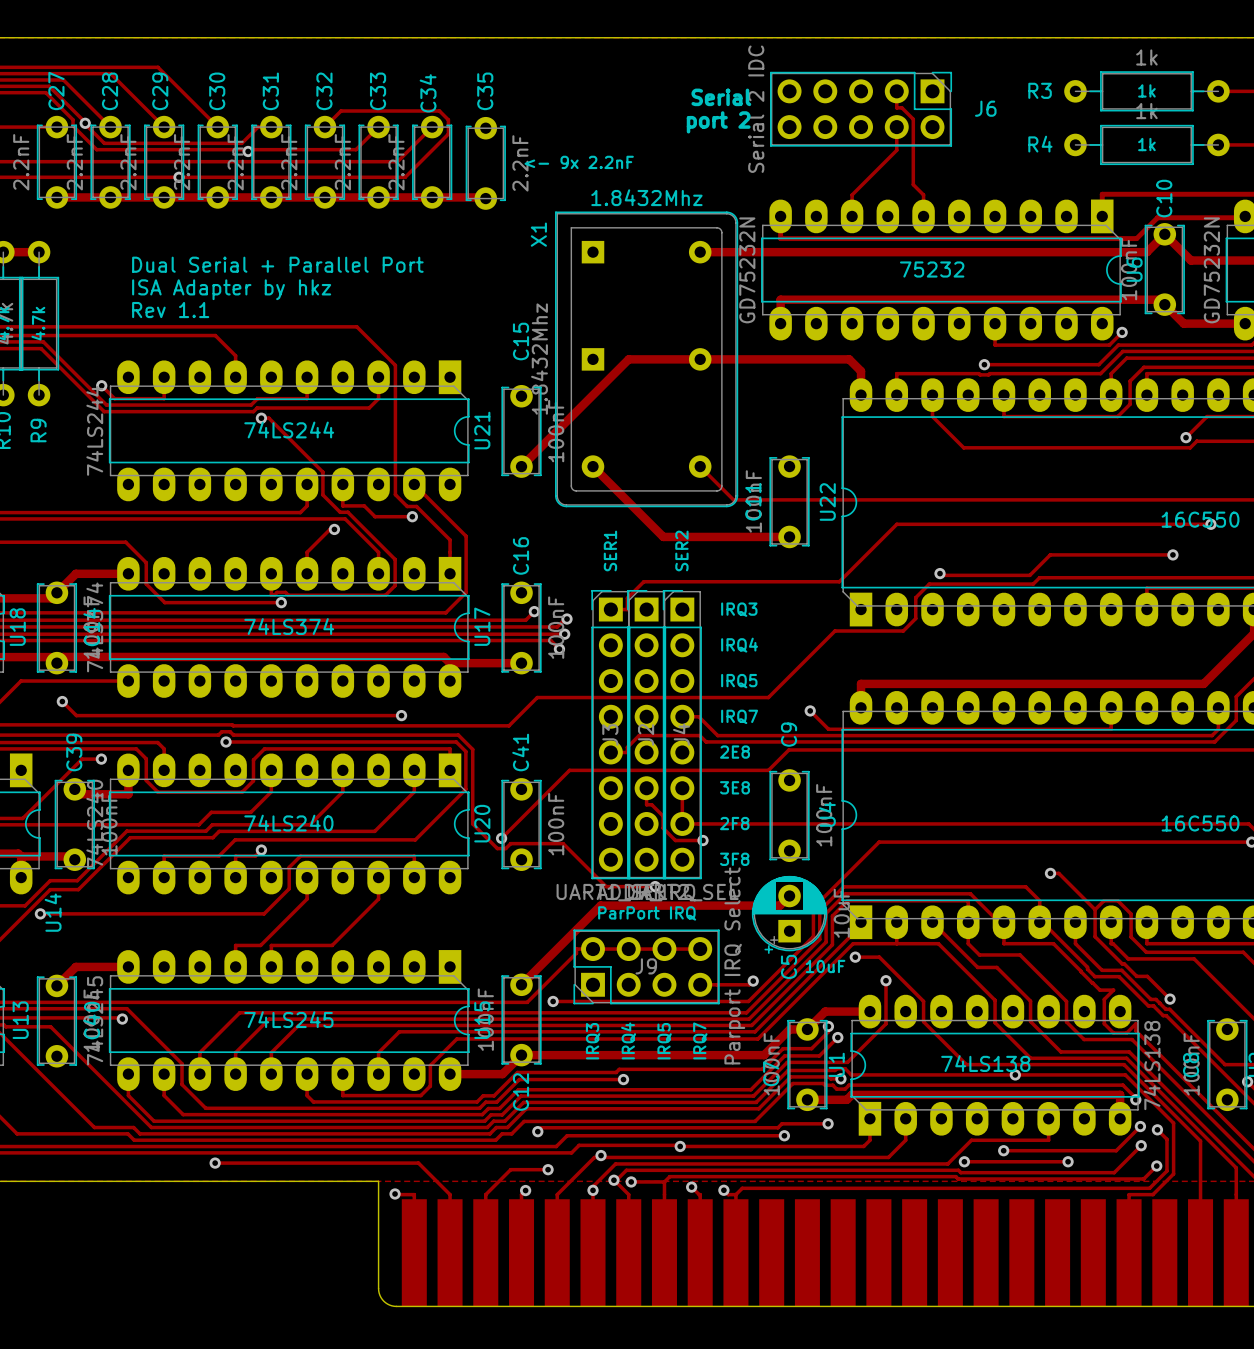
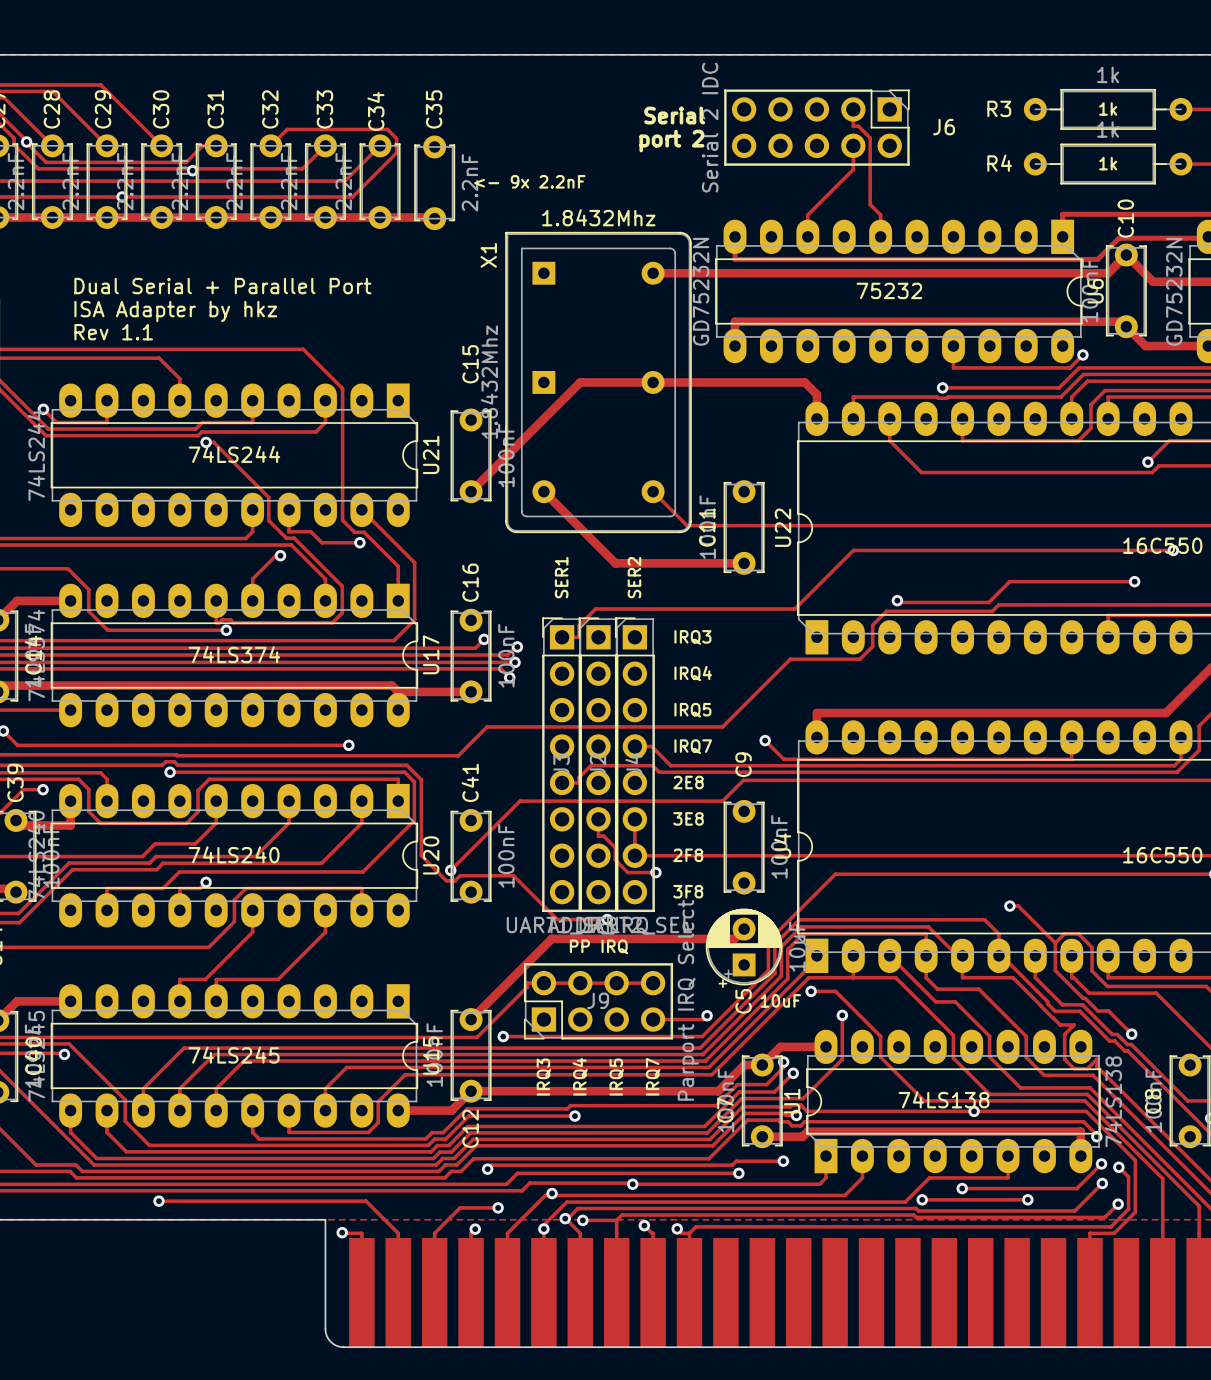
text: ParPort IRQ (647, 913) -> PP IRQ (599, 946)

